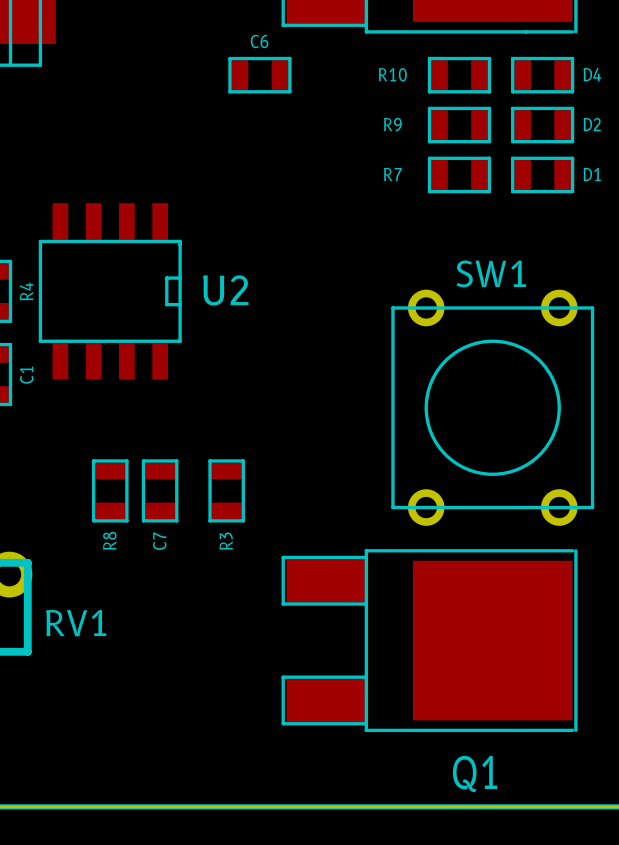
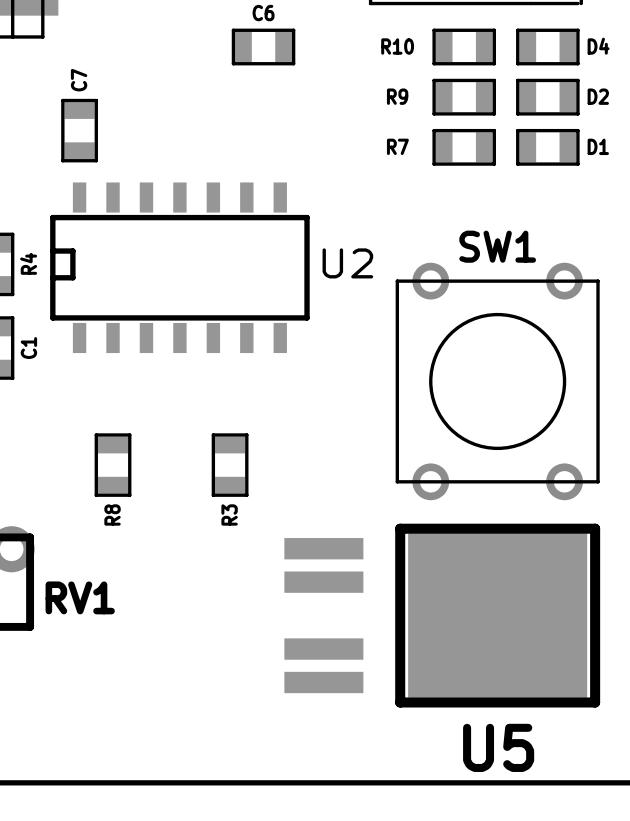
U2 footprint: [38, 203, 182, 380] -> [50, 182, 310, 354]
C7 position: (160, 490) -> (79, 130)
C7 name position: C7 (159, 541) -> C7 (79, 80)
Q1: (429, 640) -> none
U5: none -> (442, 615)

